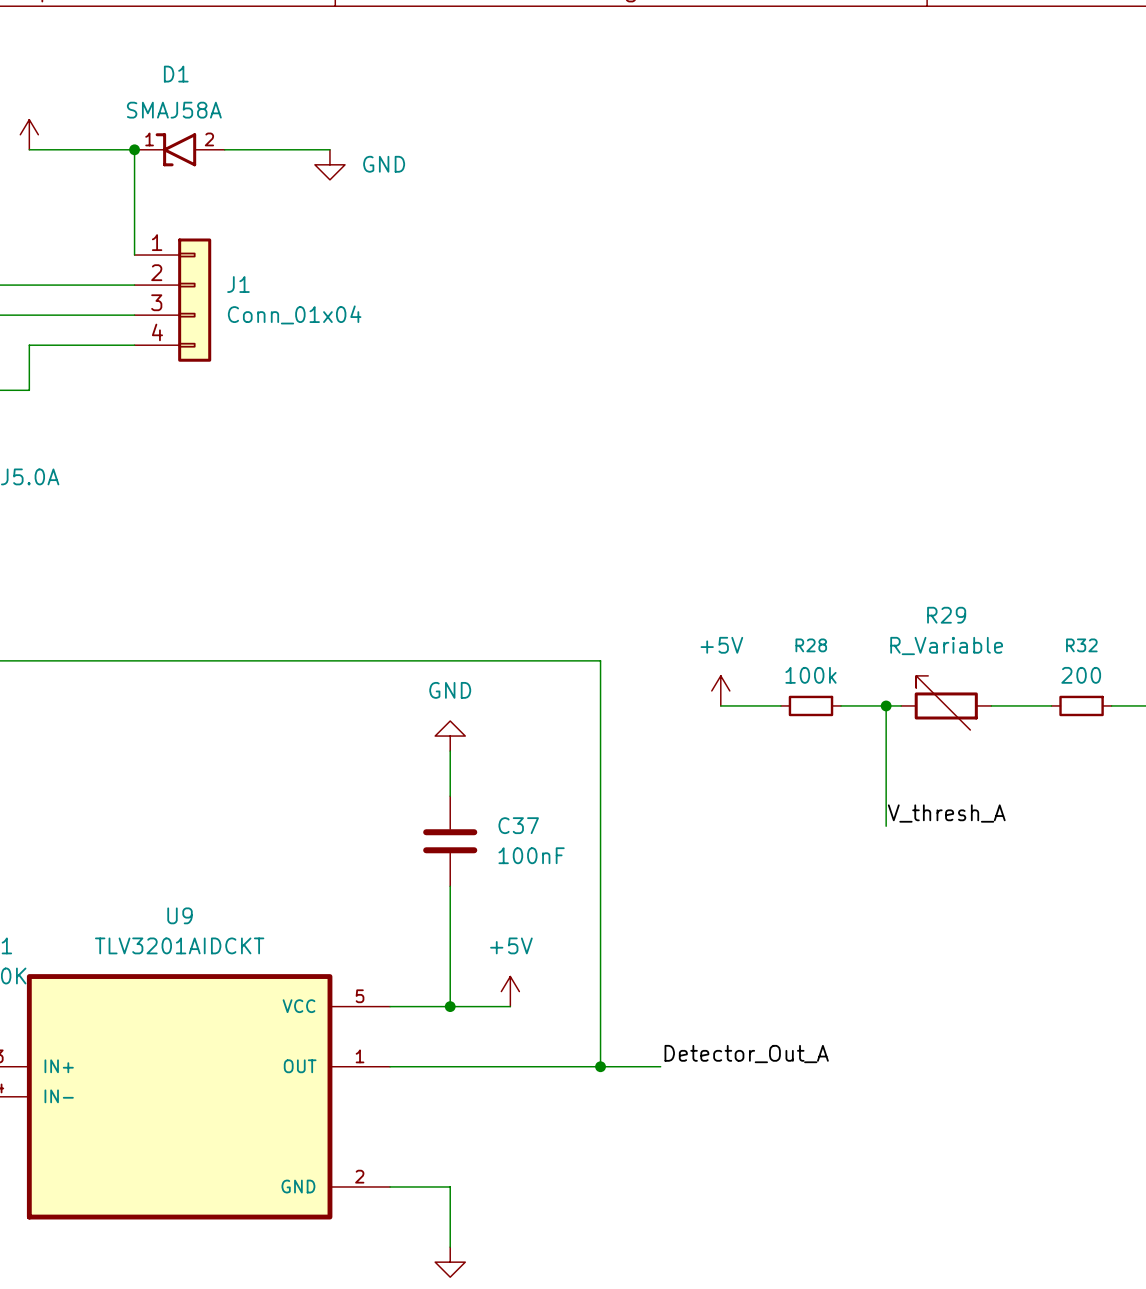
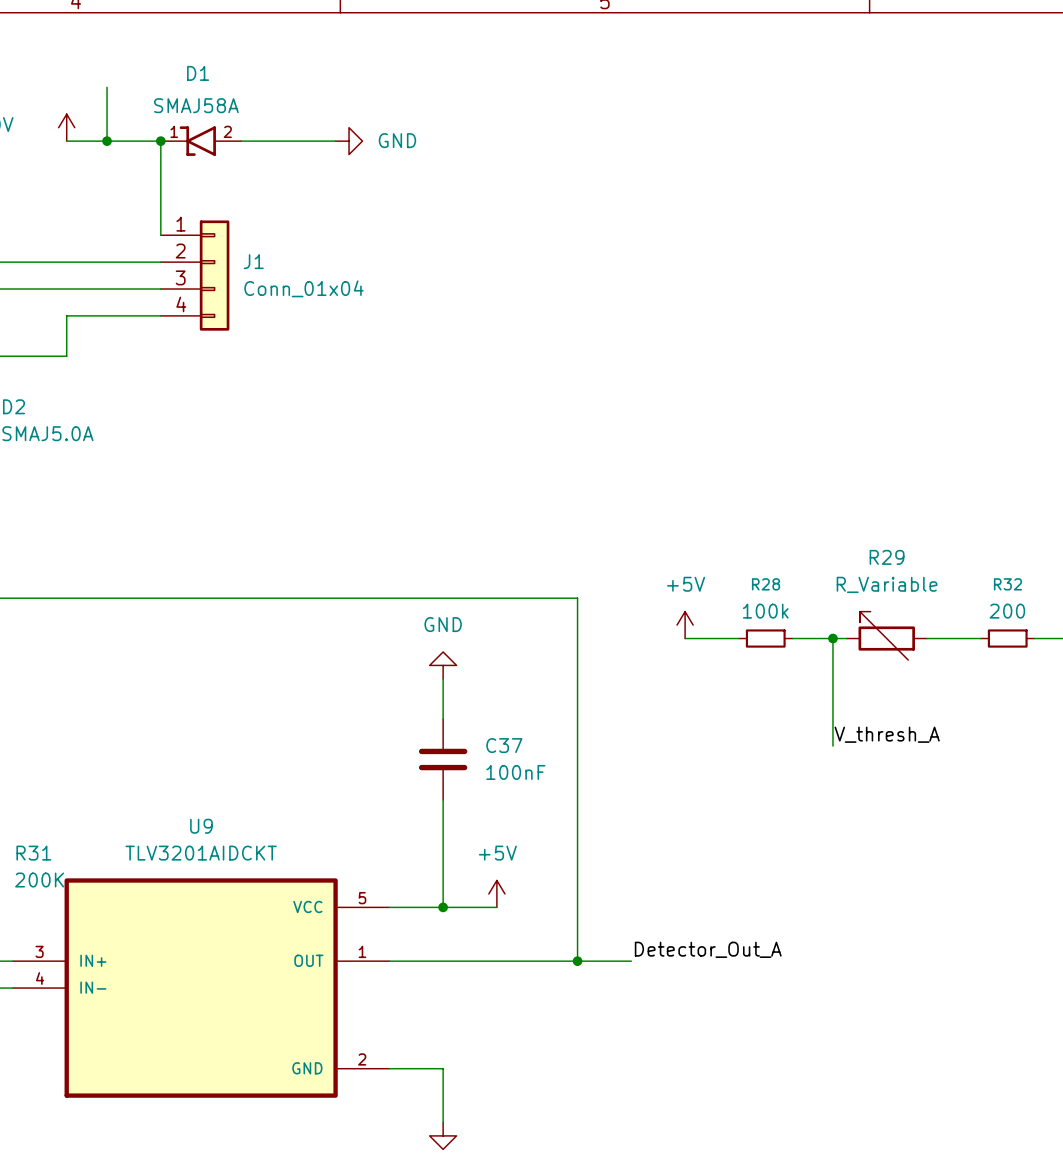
wire: none -> (107, 87) (107, 141)
junction: none -> (107, 141)
power symbol rotation: 0° (329, 164) -> 90° counterclockwise (349, 141)
power symbol position: GND (329, 164) -> GND (349, 141)

